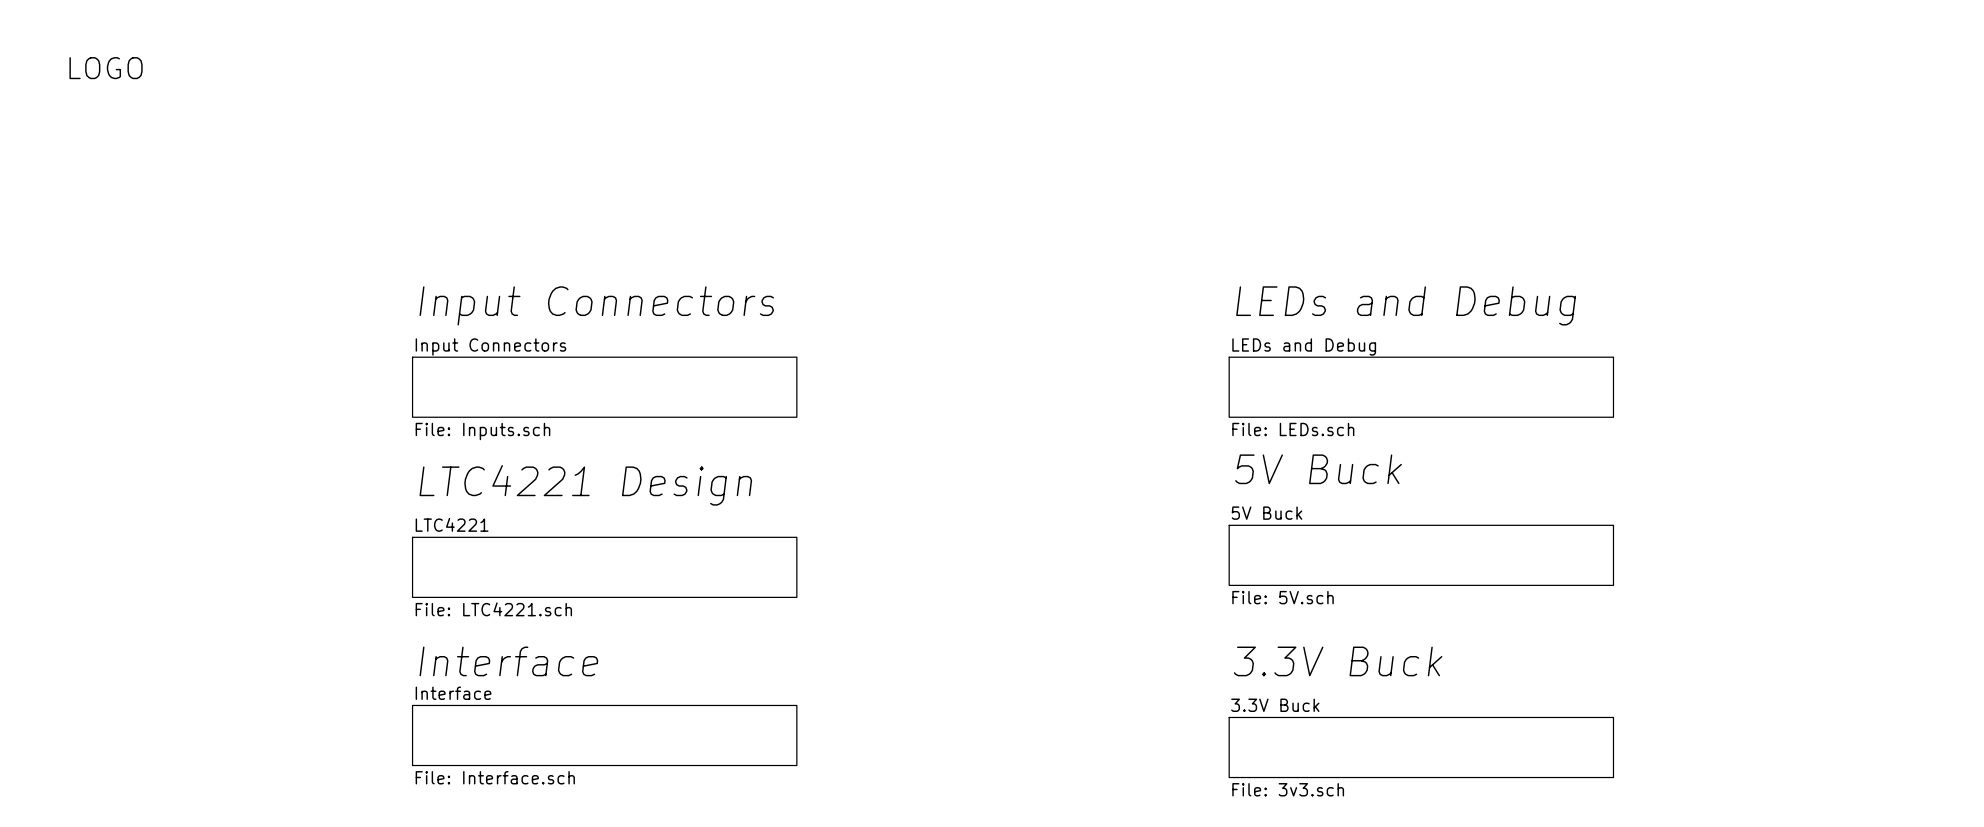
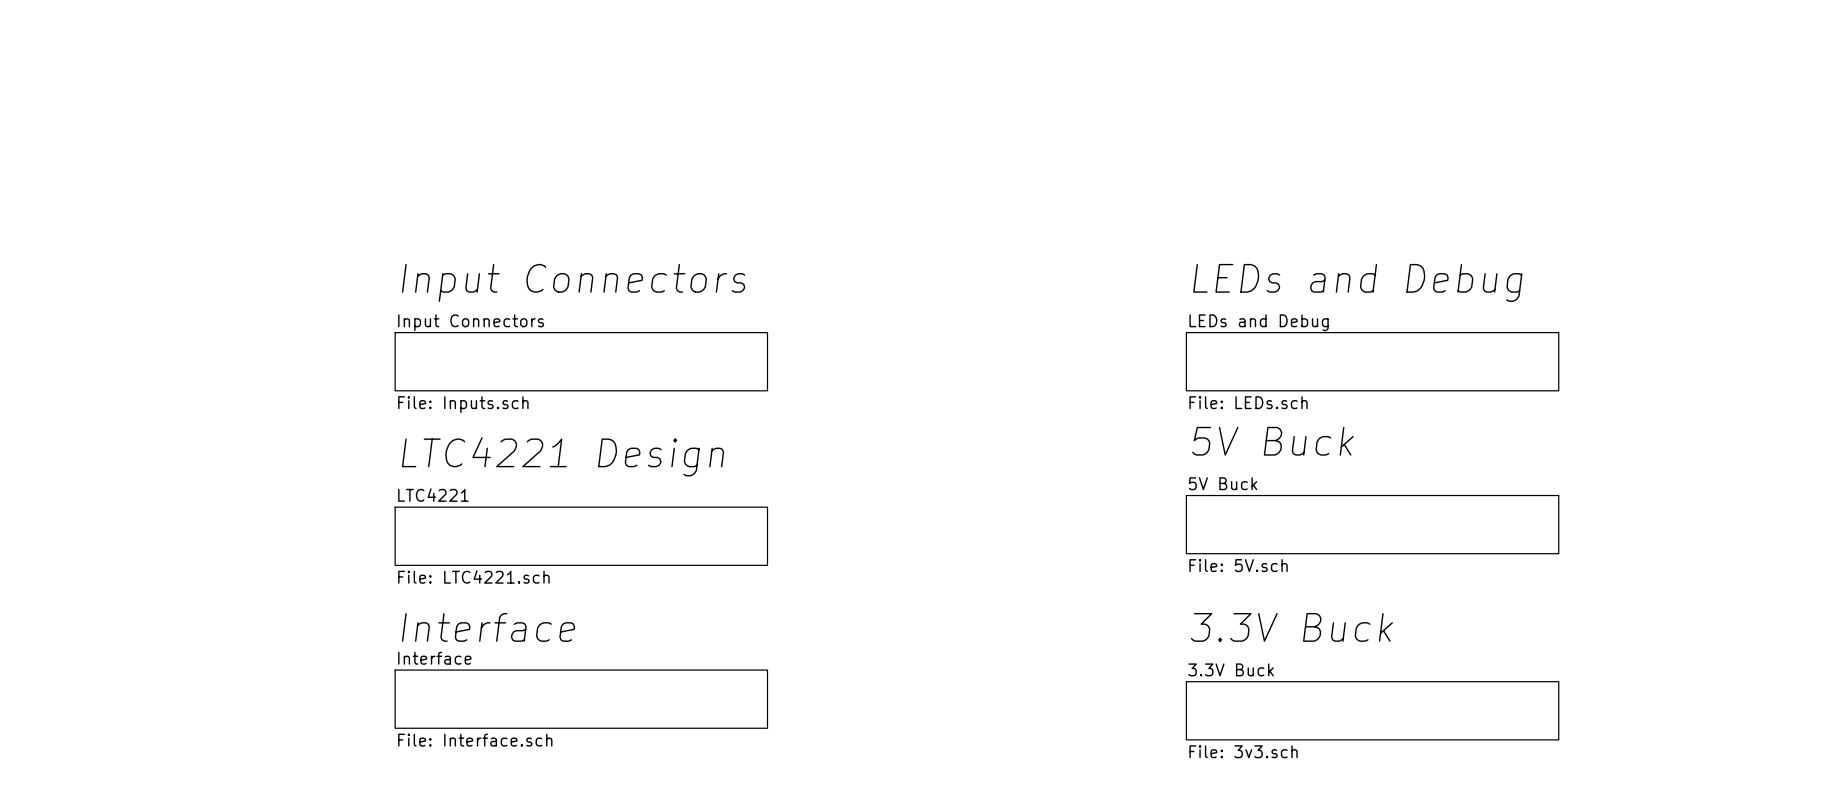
part: (106, 68) -> none

